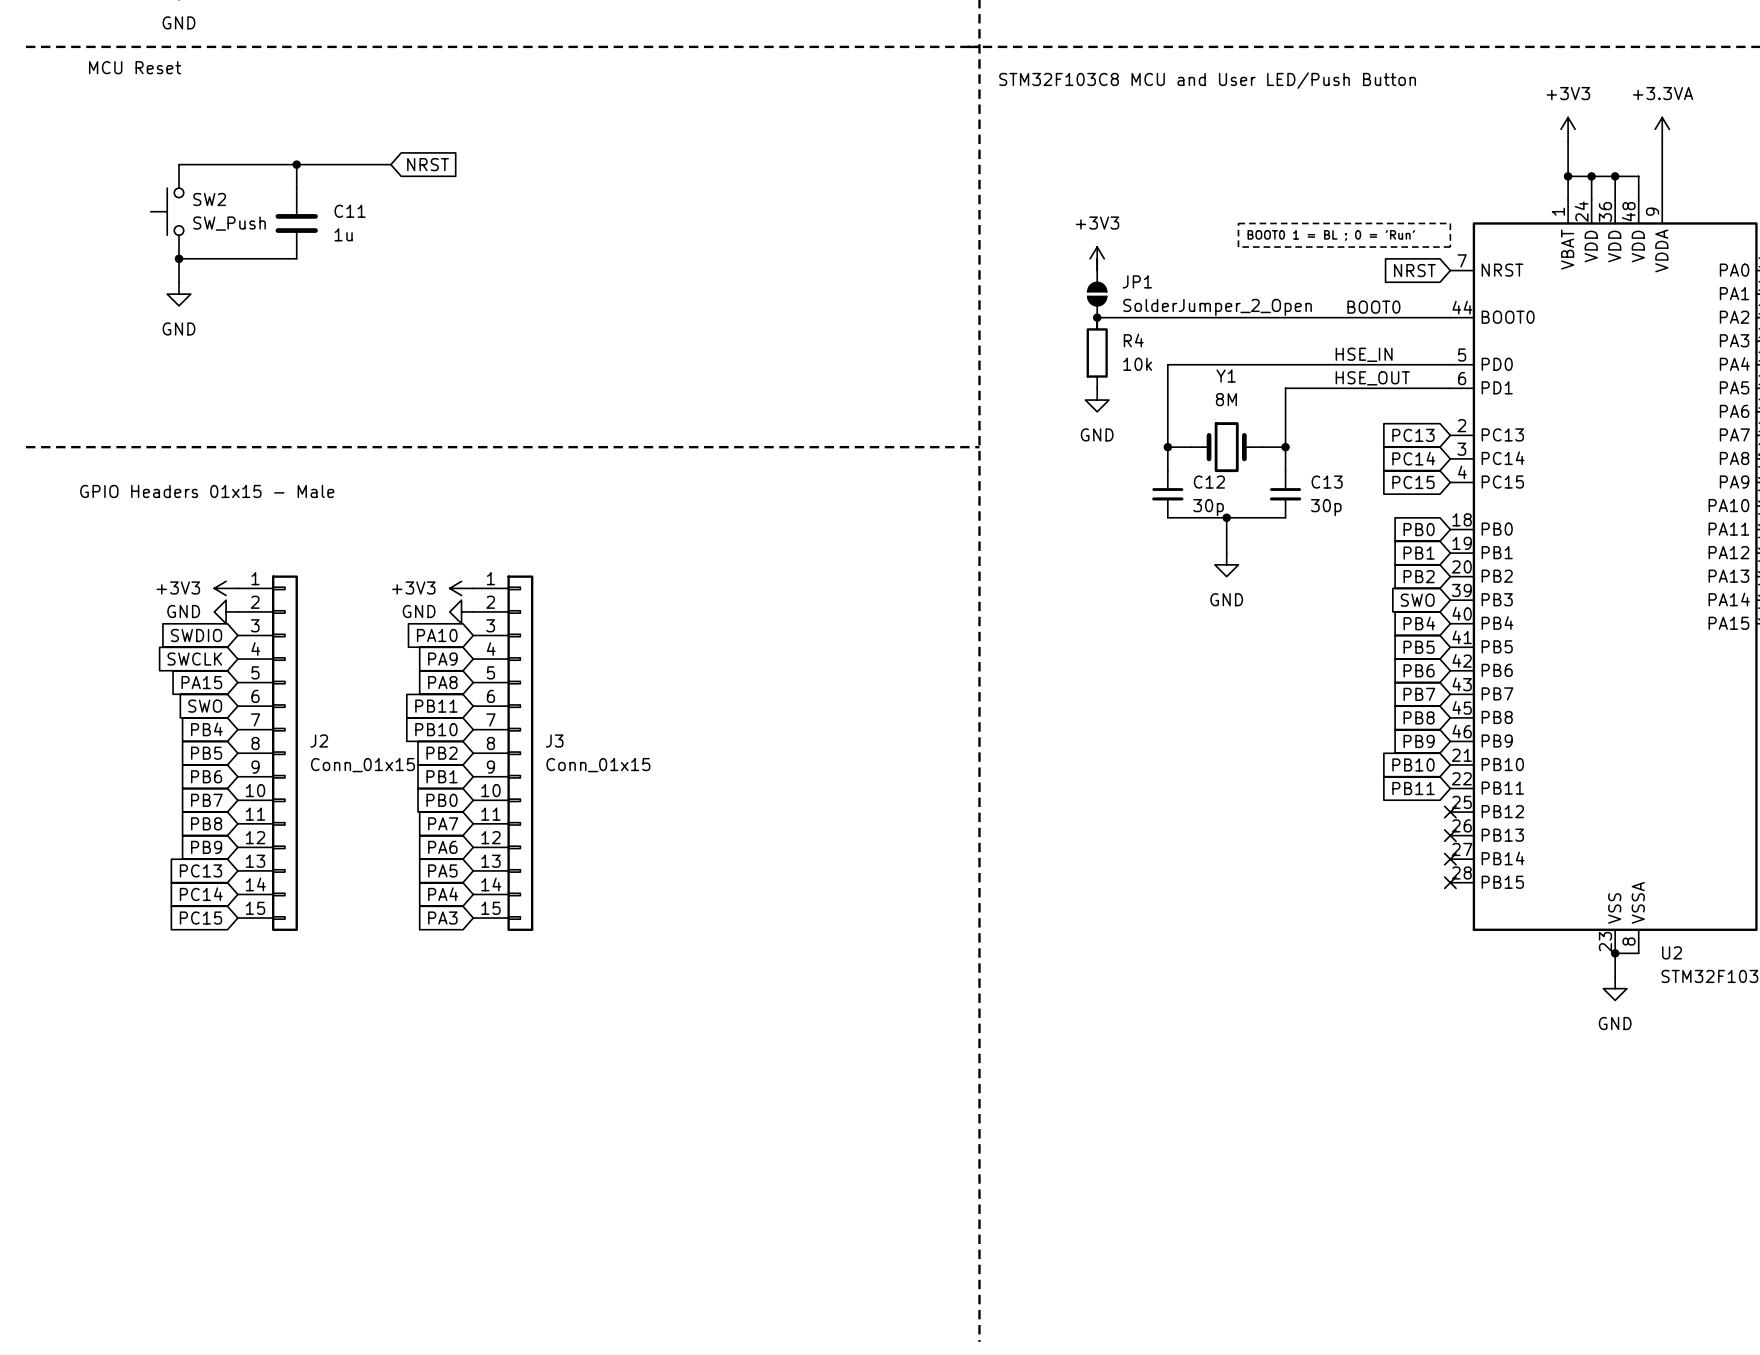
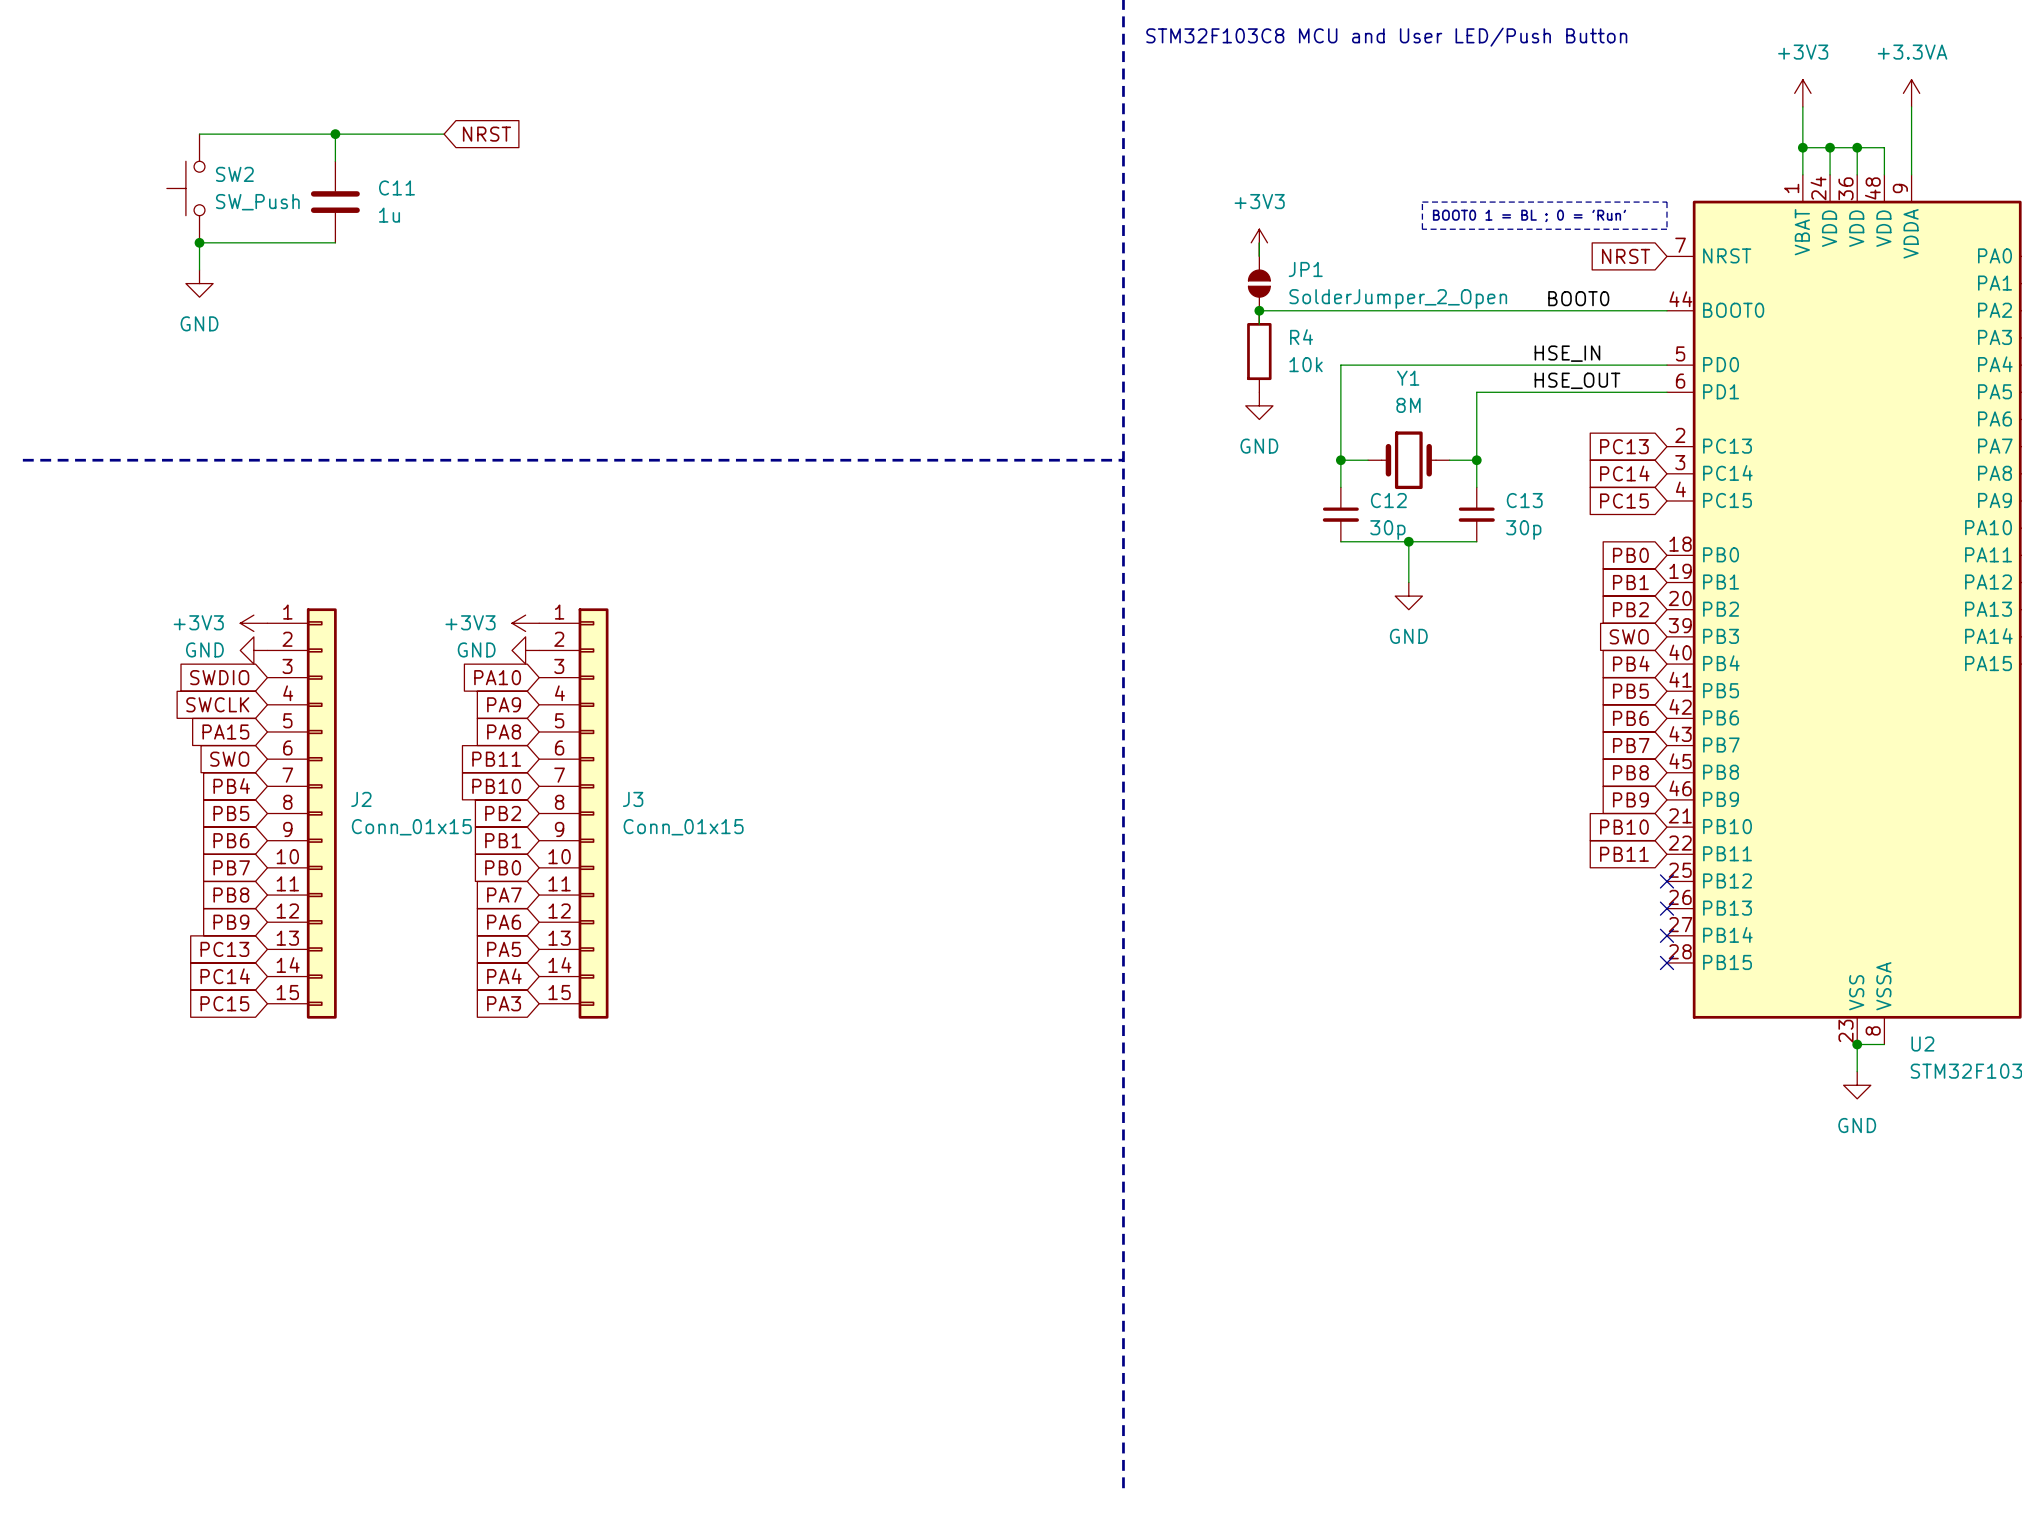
text: MCU Reset (135, 67) -> none
text: GPIO Headers 01x15 - Male (207, 491) -> none

